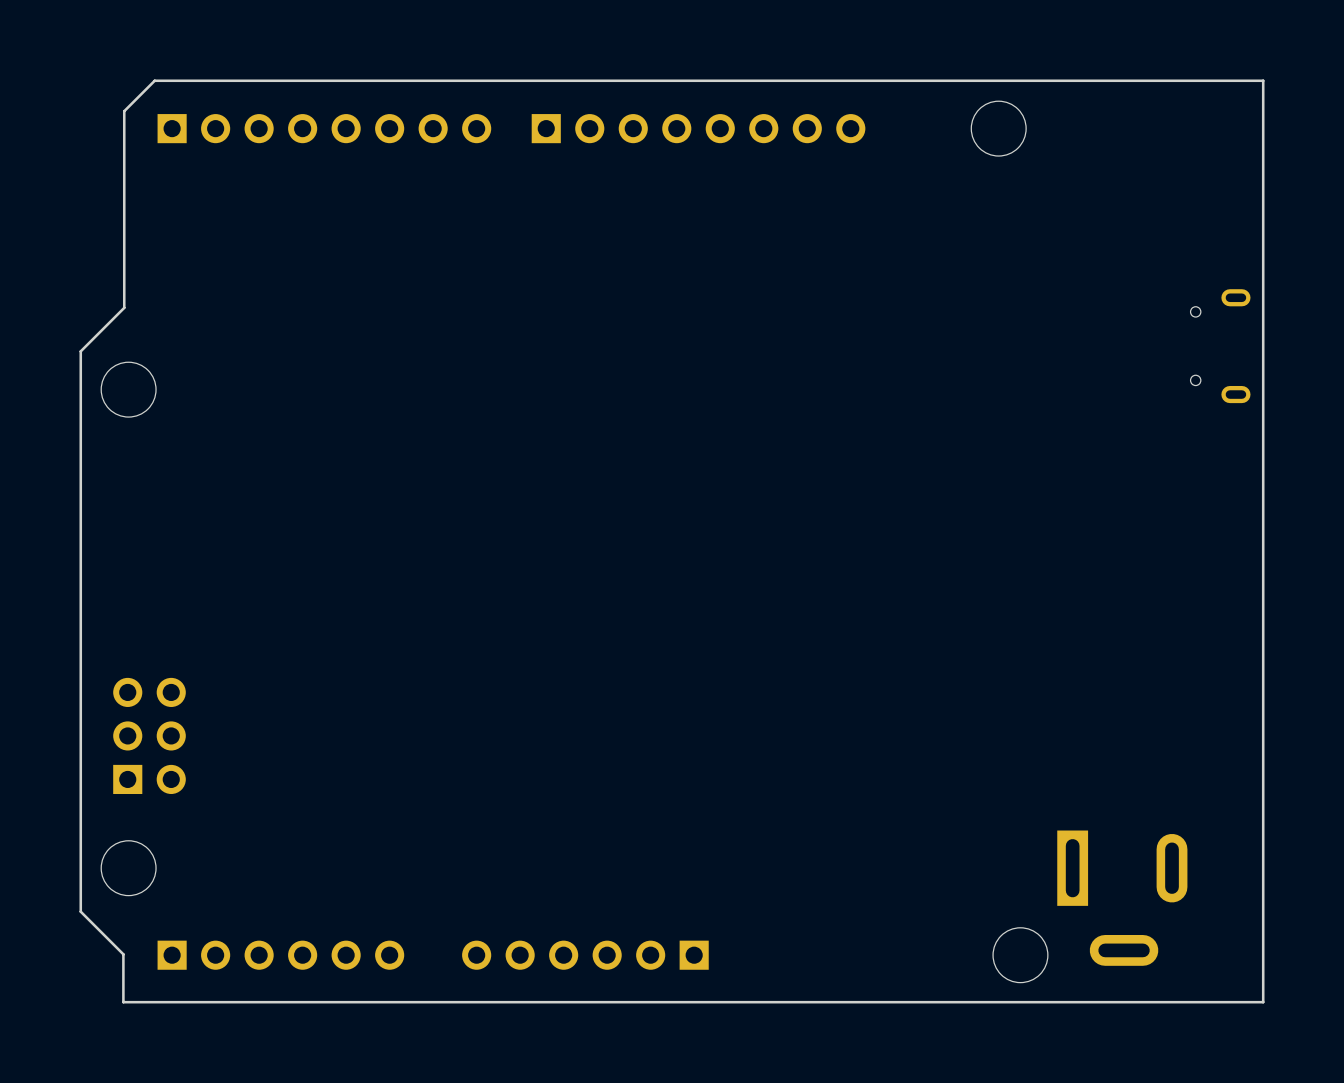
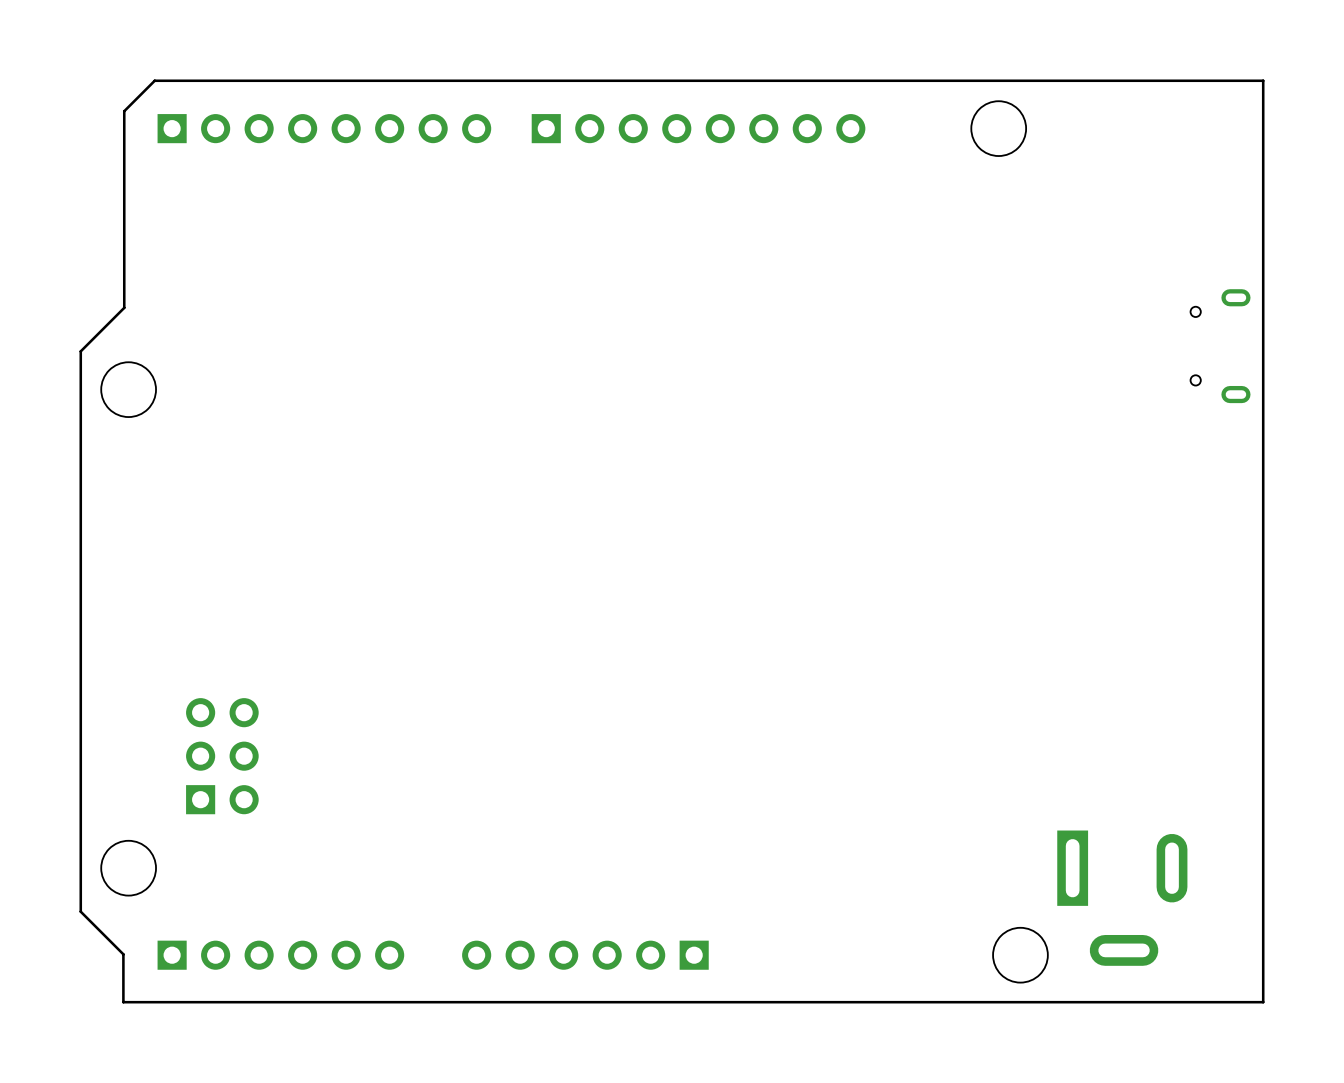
part position: (149, 735) -> (222, 756)

